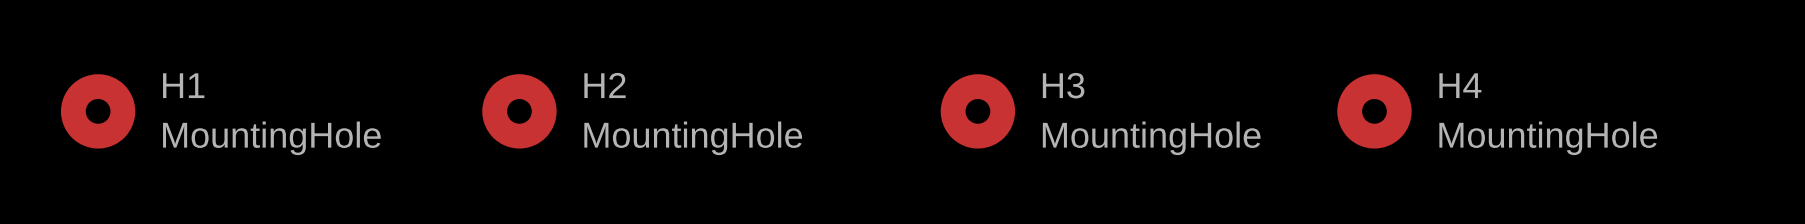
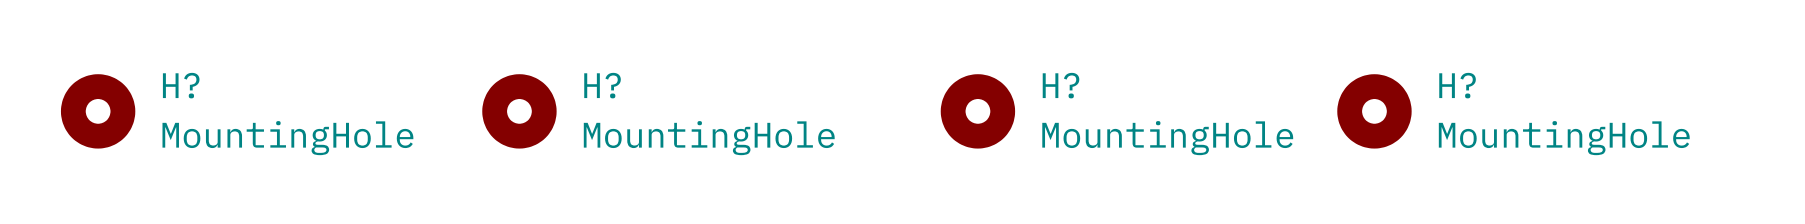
H1 name: H1 (183, 85) -> H? (181, 85)
H2 name: H2 (604, 85) -> H? (602, 85)
H3 name: H3 (1063, 85) -> H? (1061, 85)
H4 name: H4 (1460, 85) -> H? (1457, 85)

